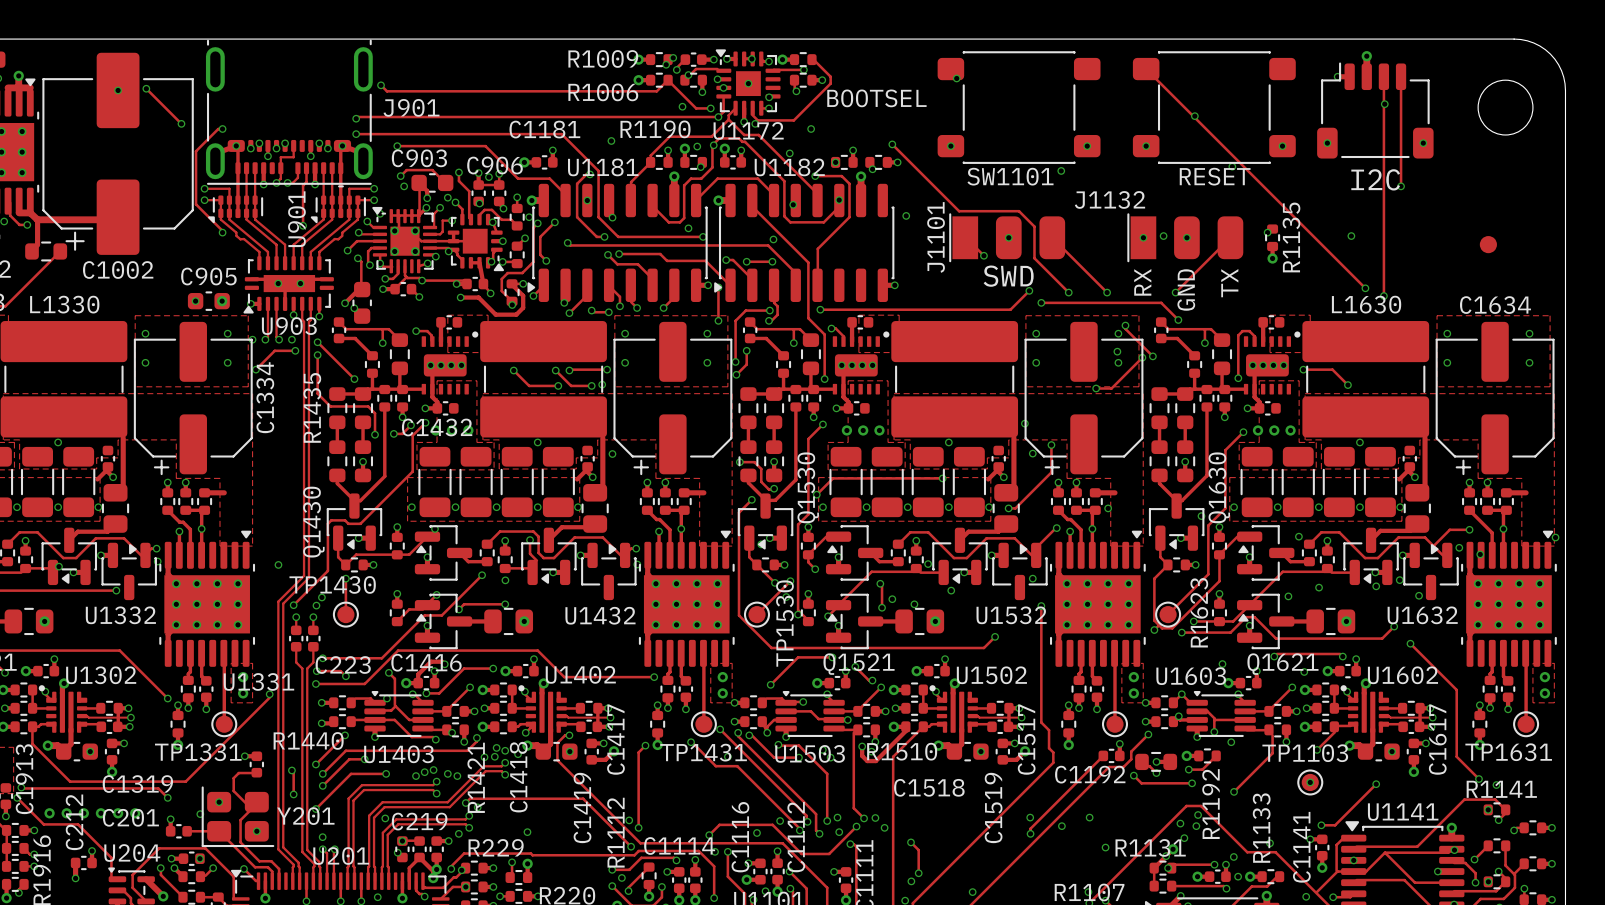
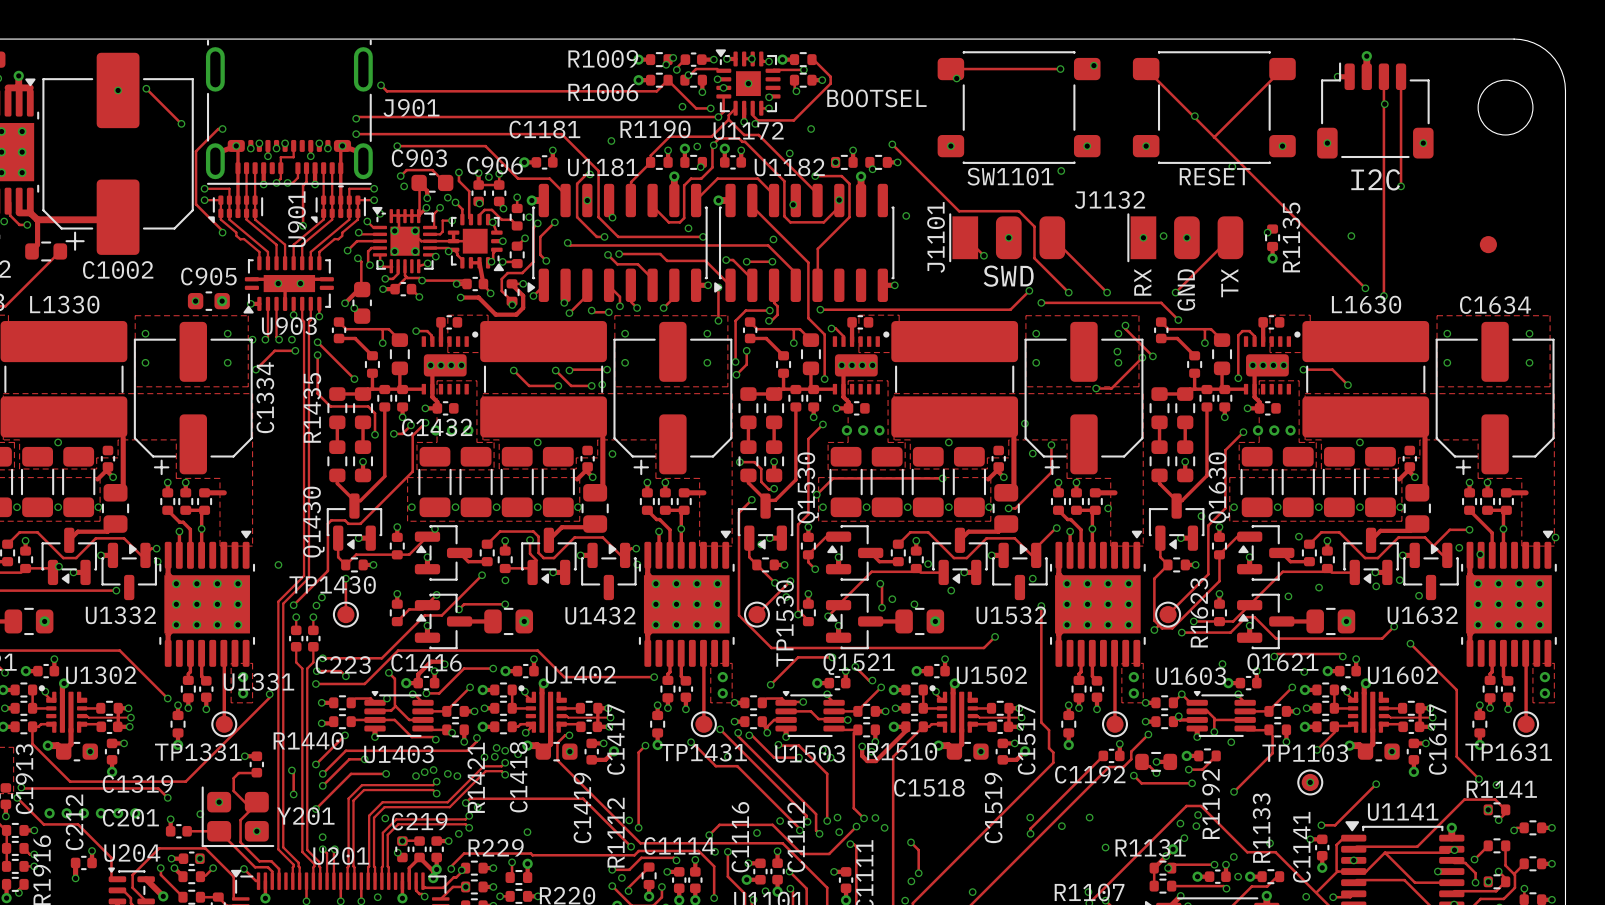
via: none -> (1093, 65)
track: none -> (950, 69) (1060, 69)
via: none -> (1060, 69)
track: none -> (1282, 69) (1214, 137)

